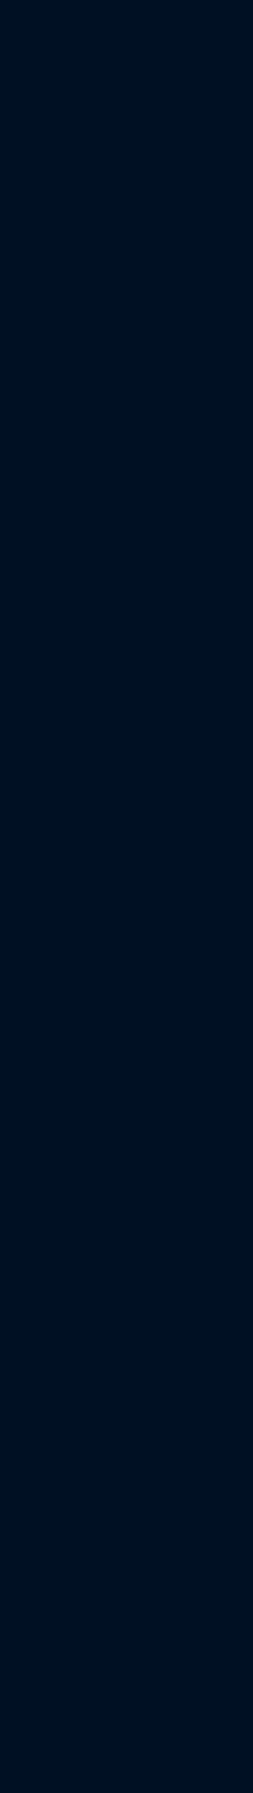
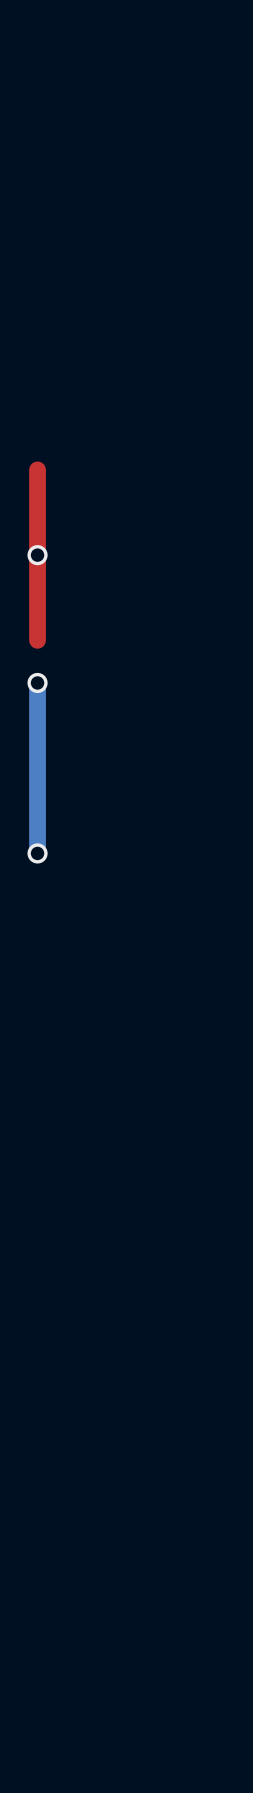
top track: none -> (37, 469) (37, 640)
via: none -> (37, 555)
bottom track: none -> (37, 682) (37, 853)
via: none -> (37, 682)
via: none -> (37, 853)

